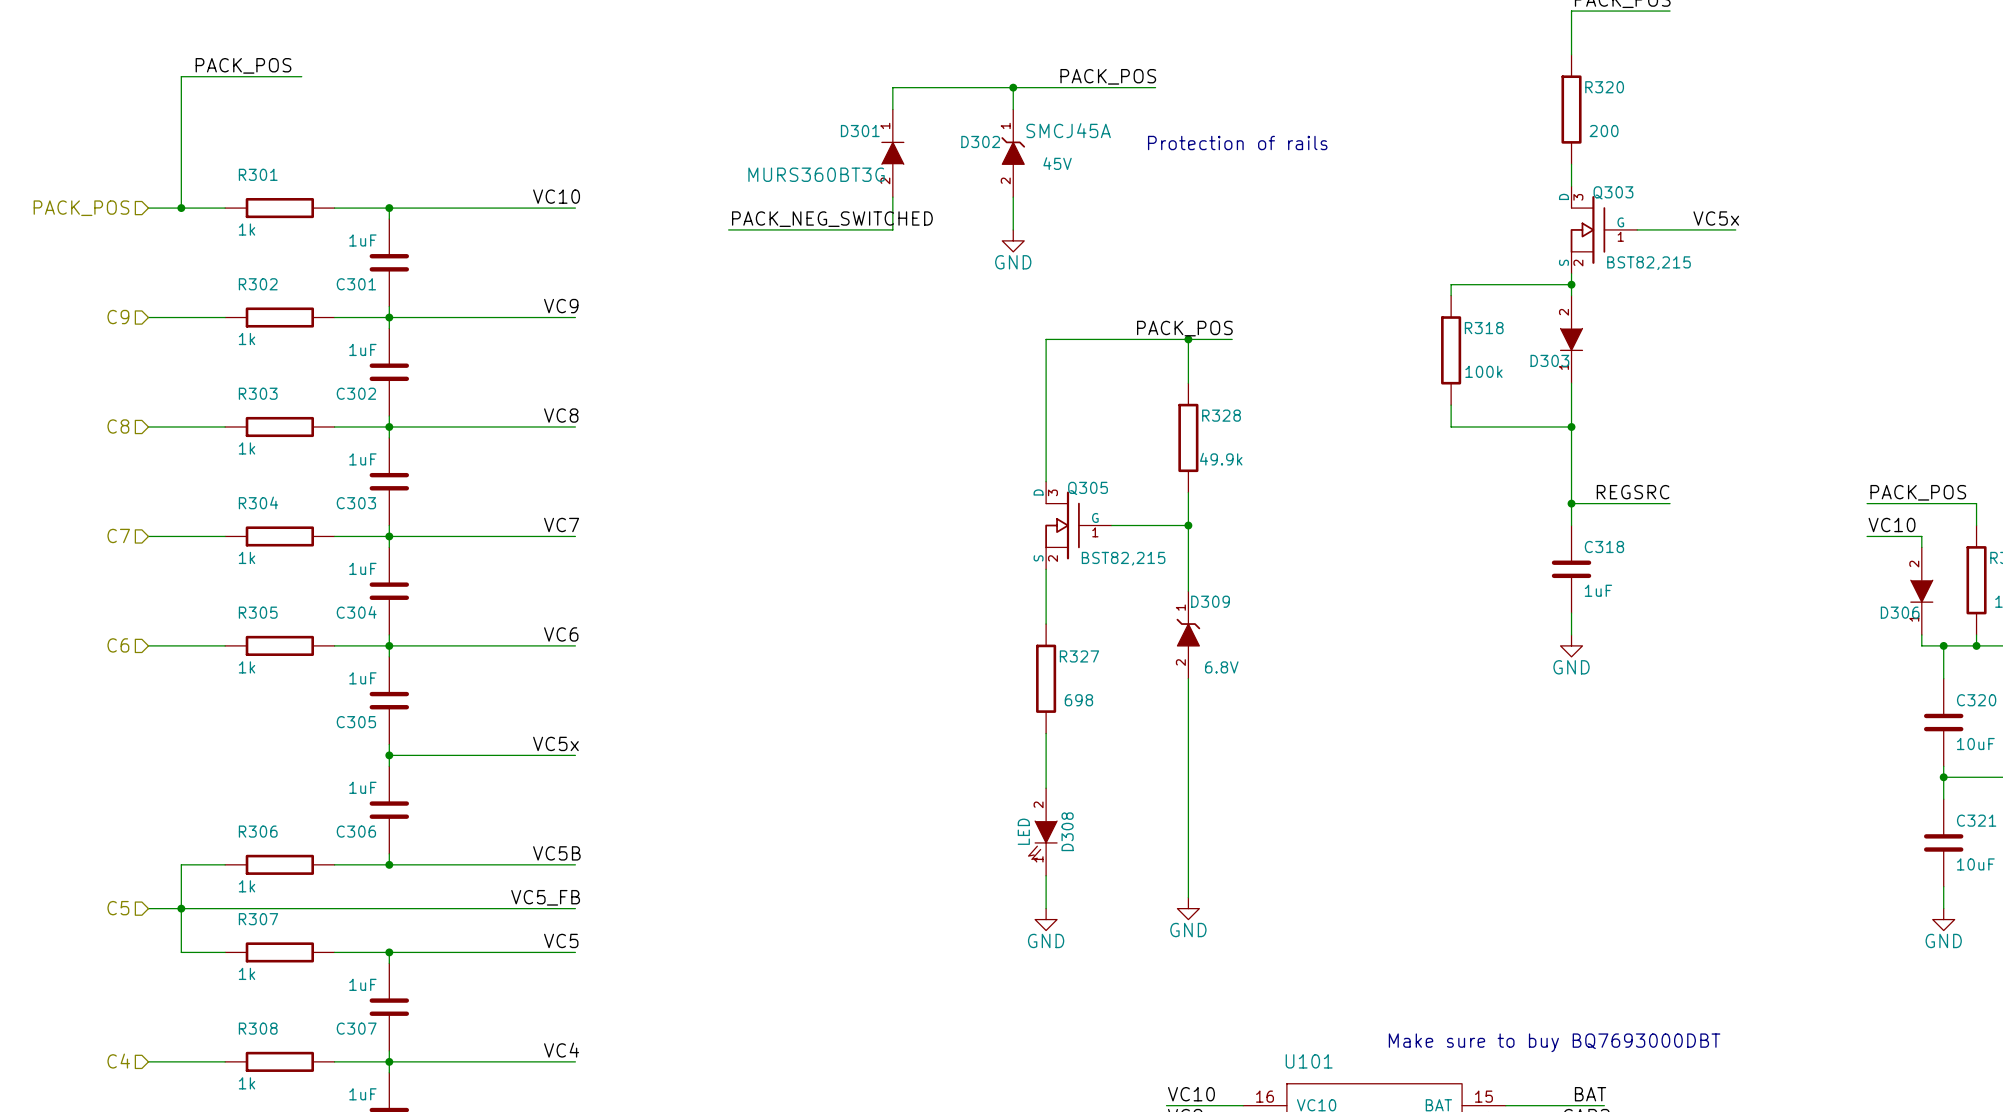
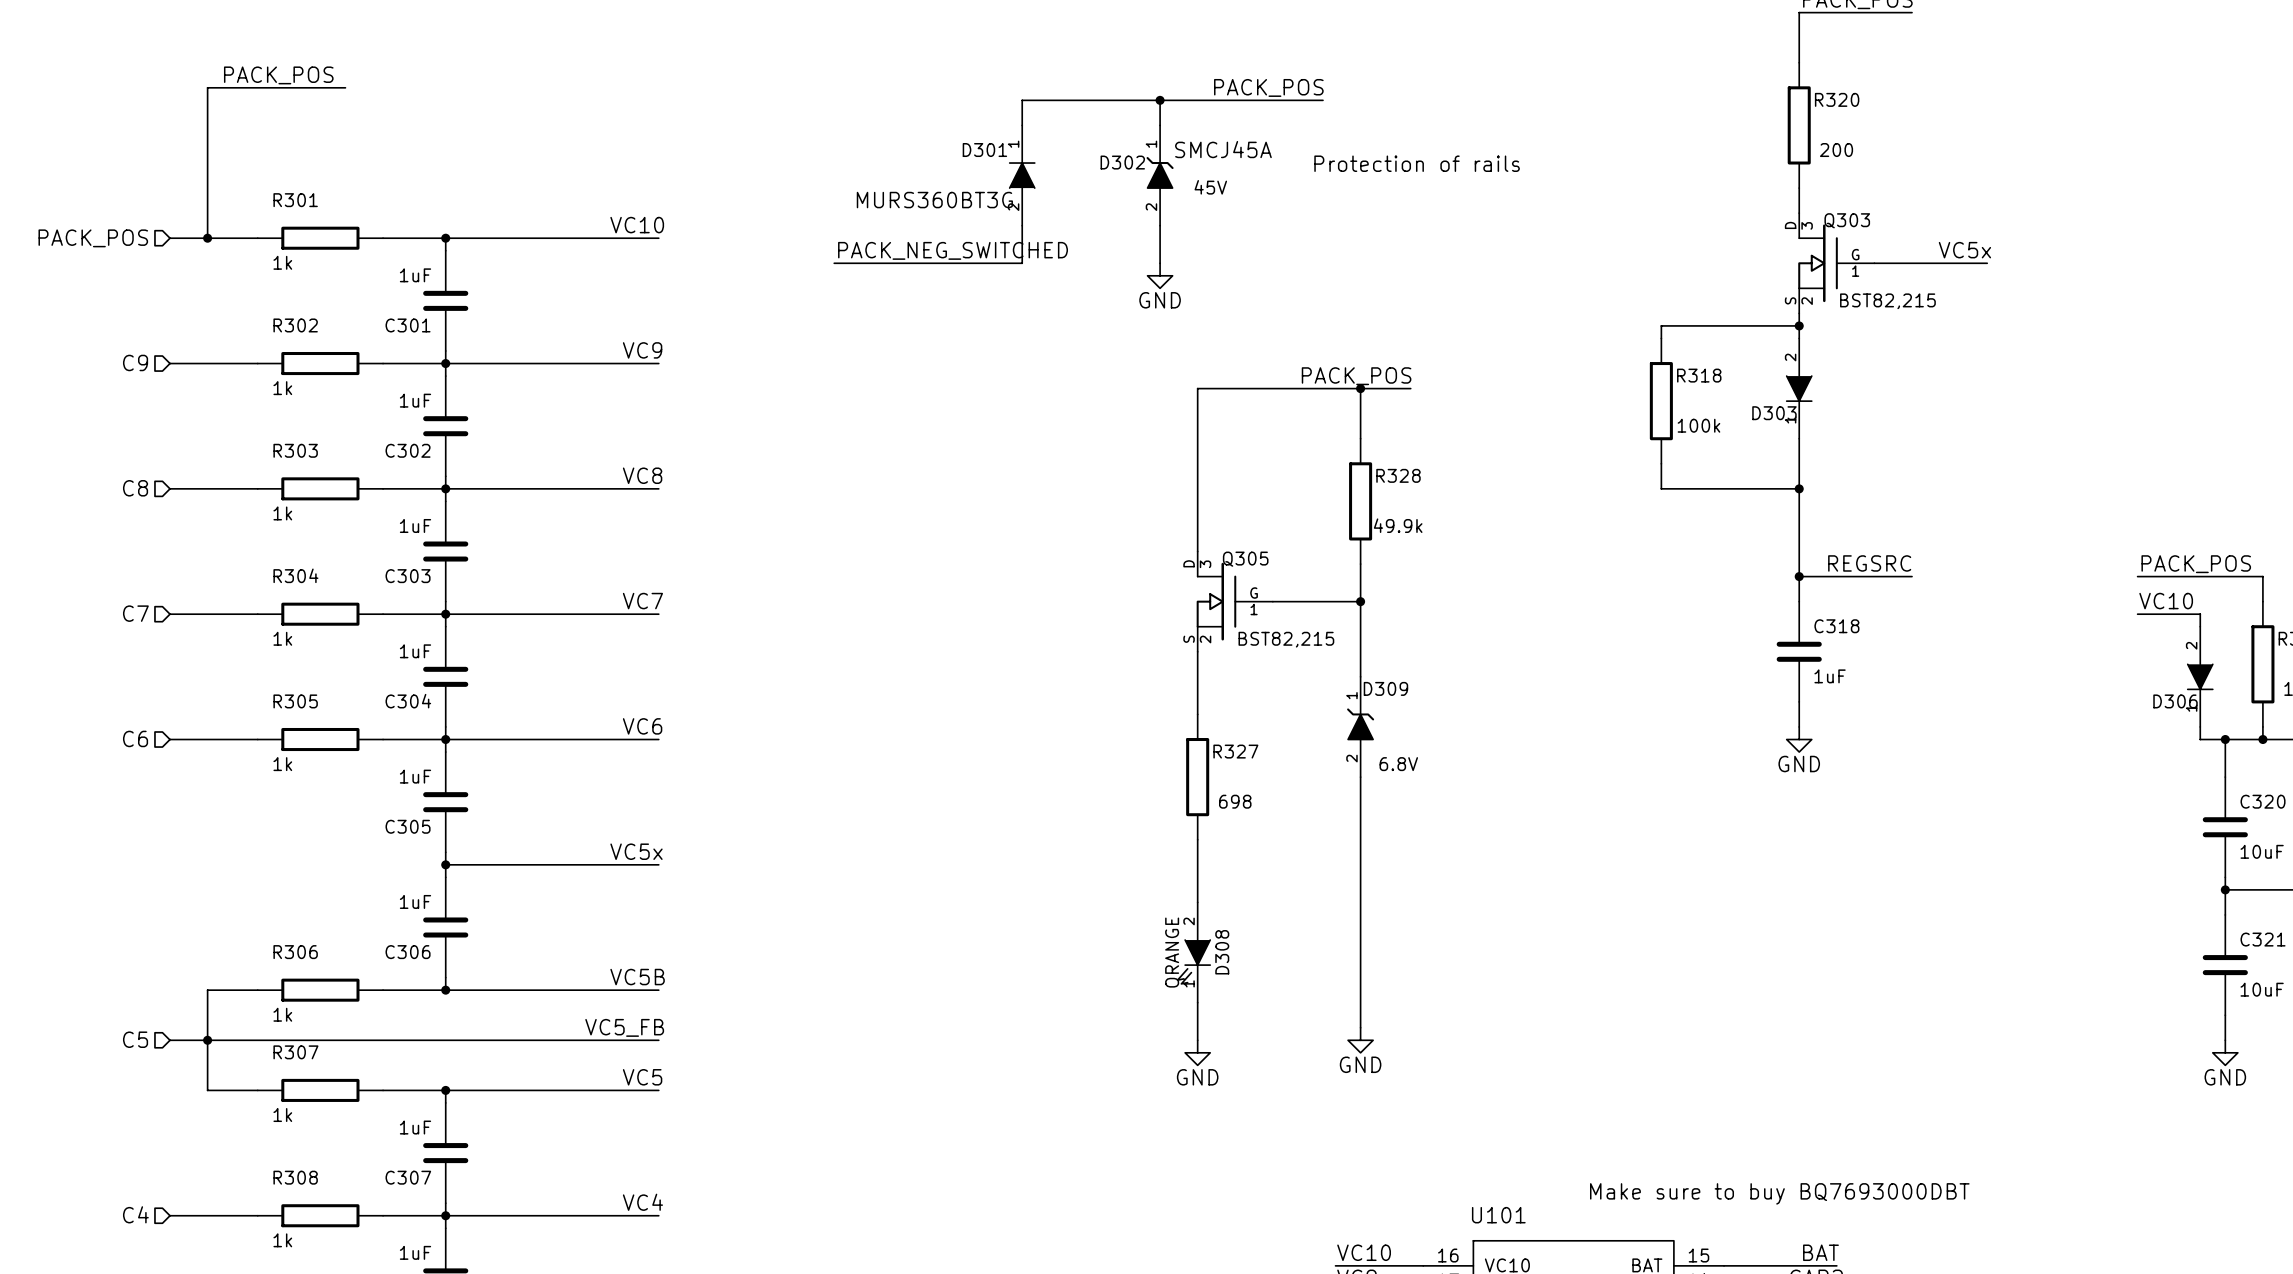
D308 value: LED (1023, 831) -> ORANGE (1172, 952)

